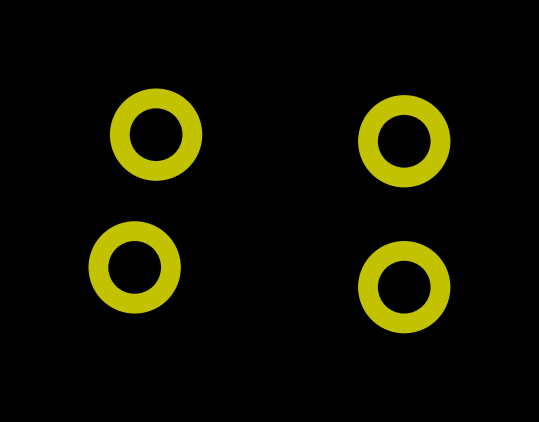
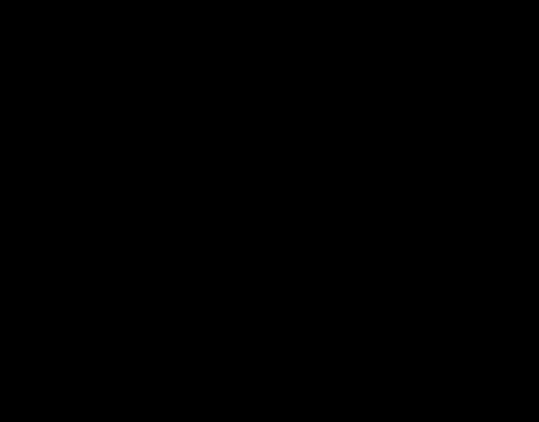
part: (156, 134) -> none
part: (404, 141) -> none
part: (134, 267) -> none
part: (404, 287) -> none

